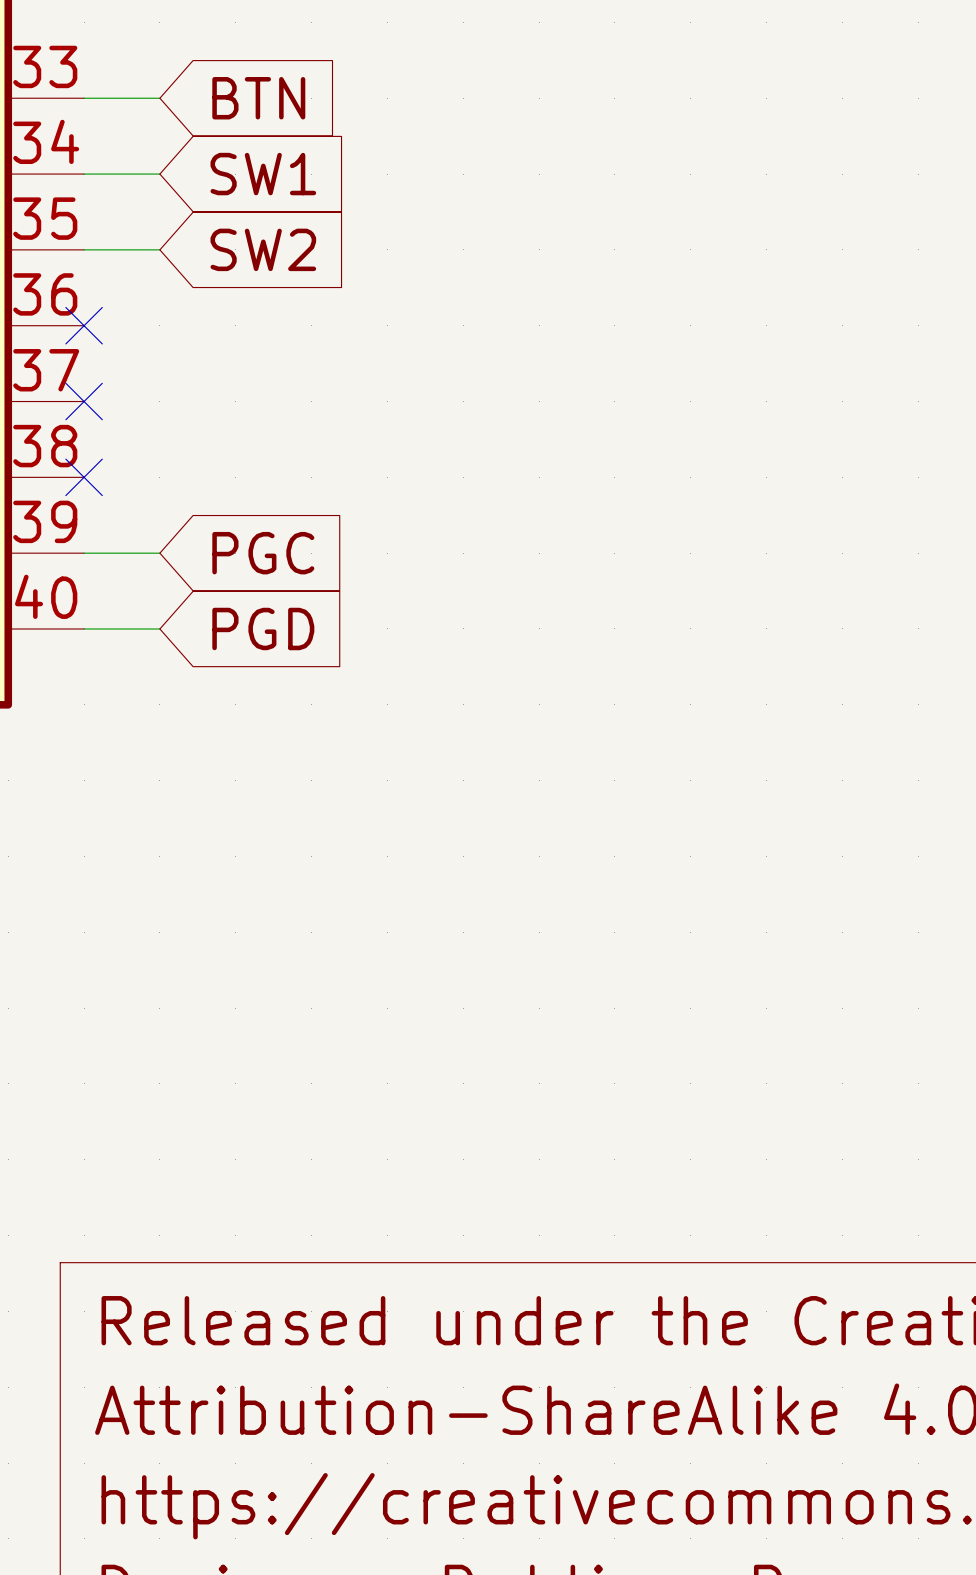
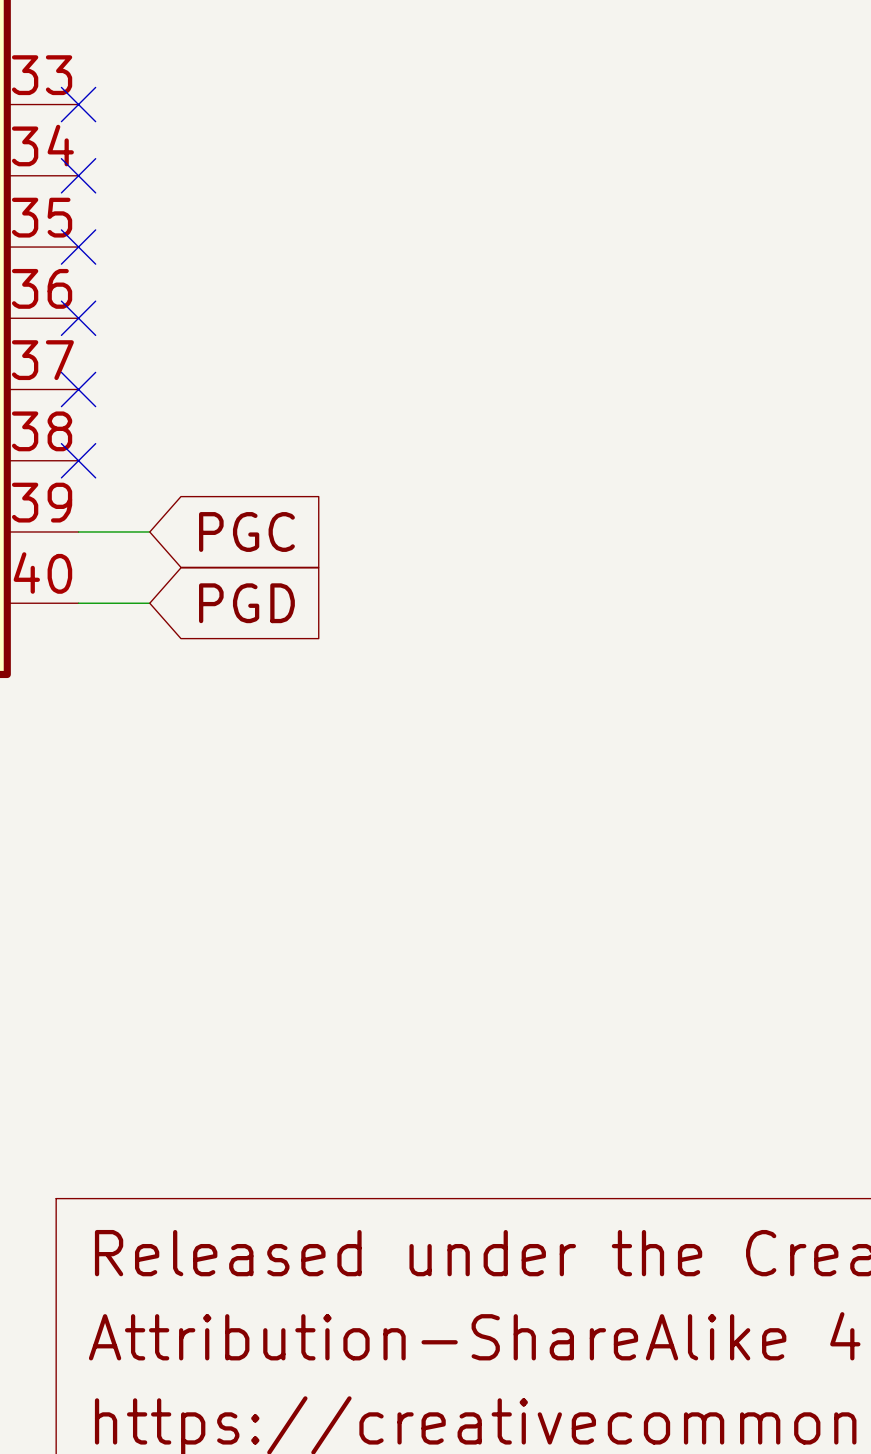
wire: (84, 98) (159, 98) -> none
no-connect mark: none -> (78, 104)
global label: BTN (258, 98) -> none
wire: (84, 174) (159, 174) -> none
no-connect mark: none -> (78, 175)
global label: SW1 (263, 174) -> none
wire: (84, 249) (159, 249) -> none
no-connect mark: none -> (78, 247)
global label: SW2 (263, 249) -> none

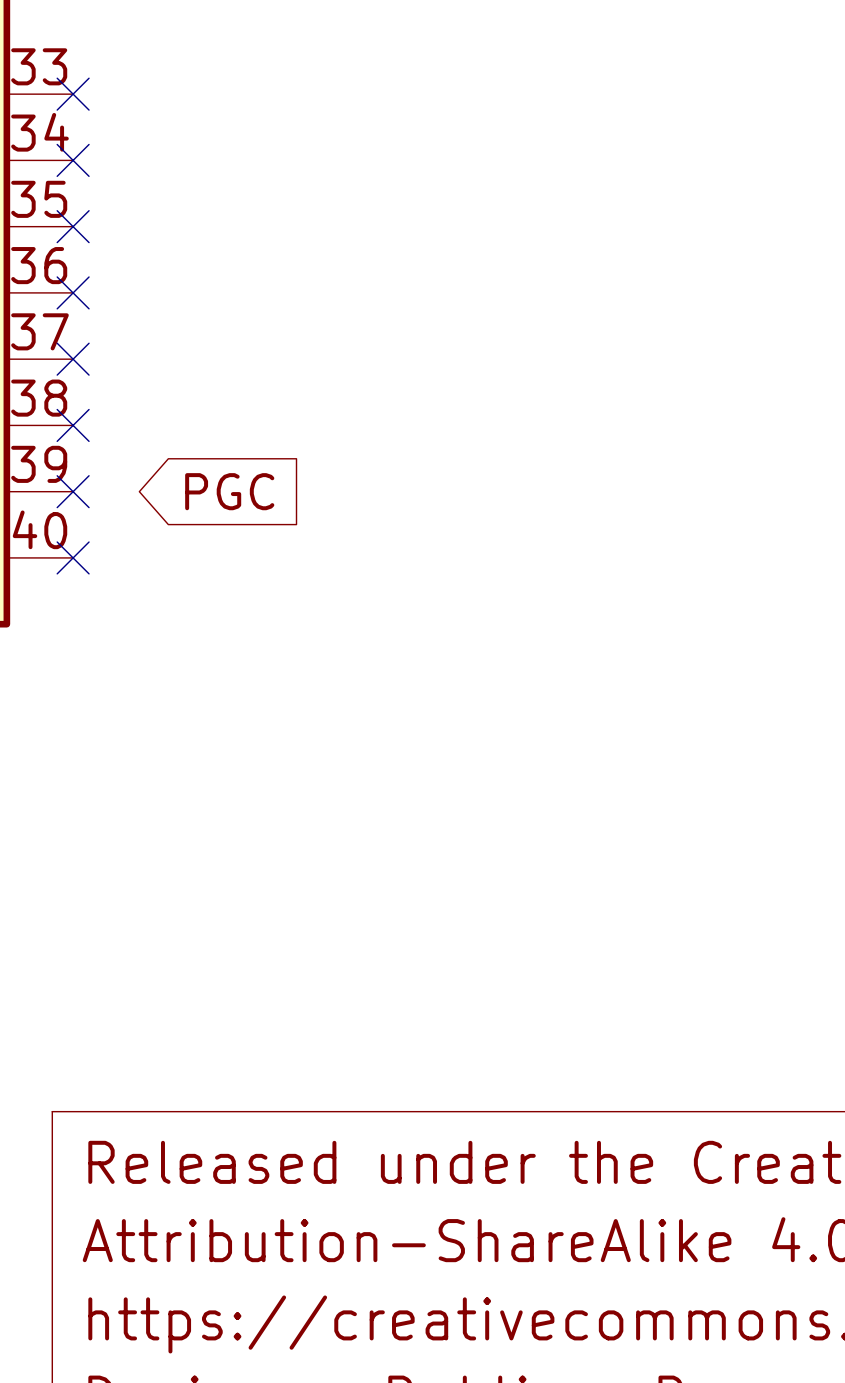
wire: (78, 531) (149, 531) -> none
no-connect mark: none -> (73, 491)
wire: (78, 603) (149, 603) -> none
no-connect mark: none -> (73, 557)
global label: PGD (246, 603) -> none

